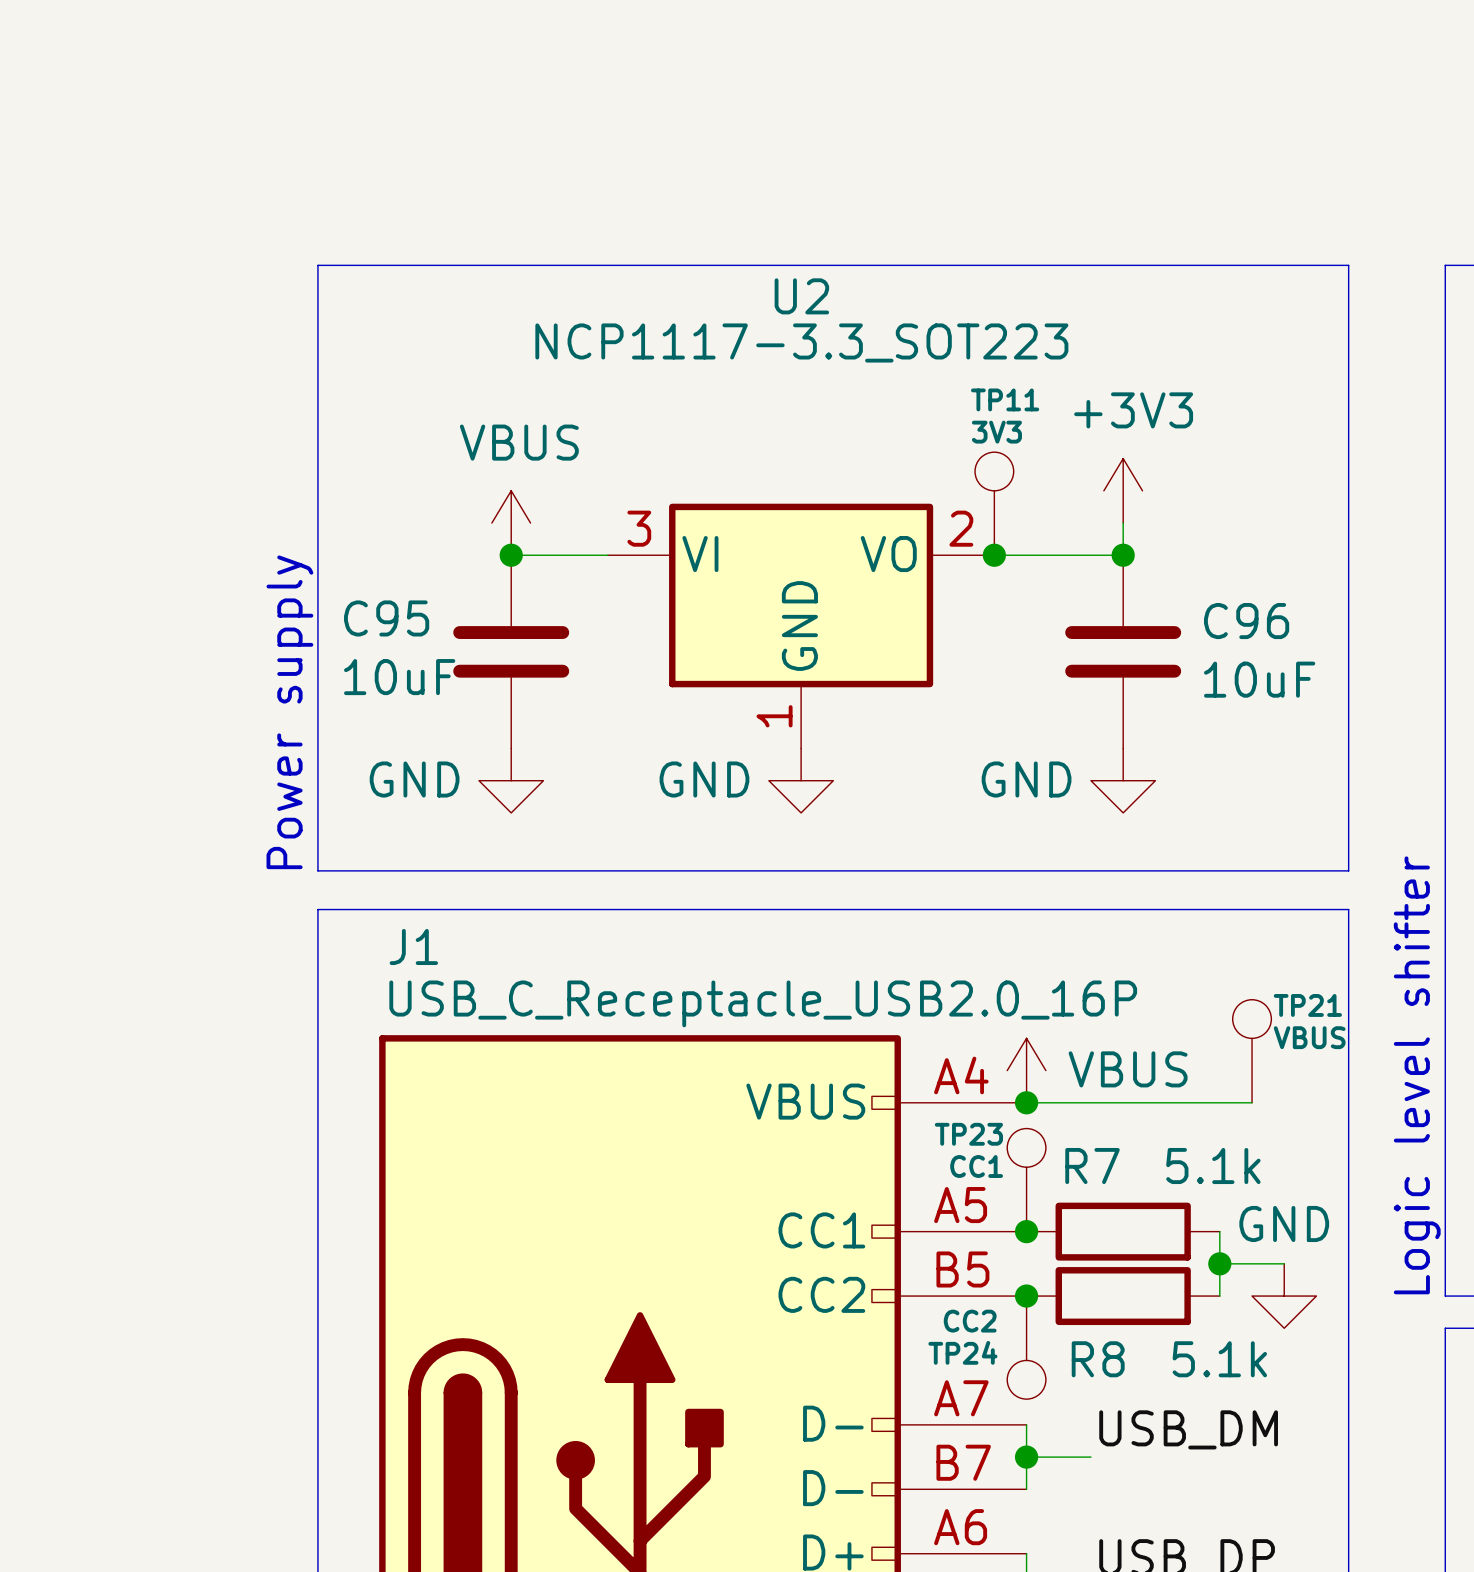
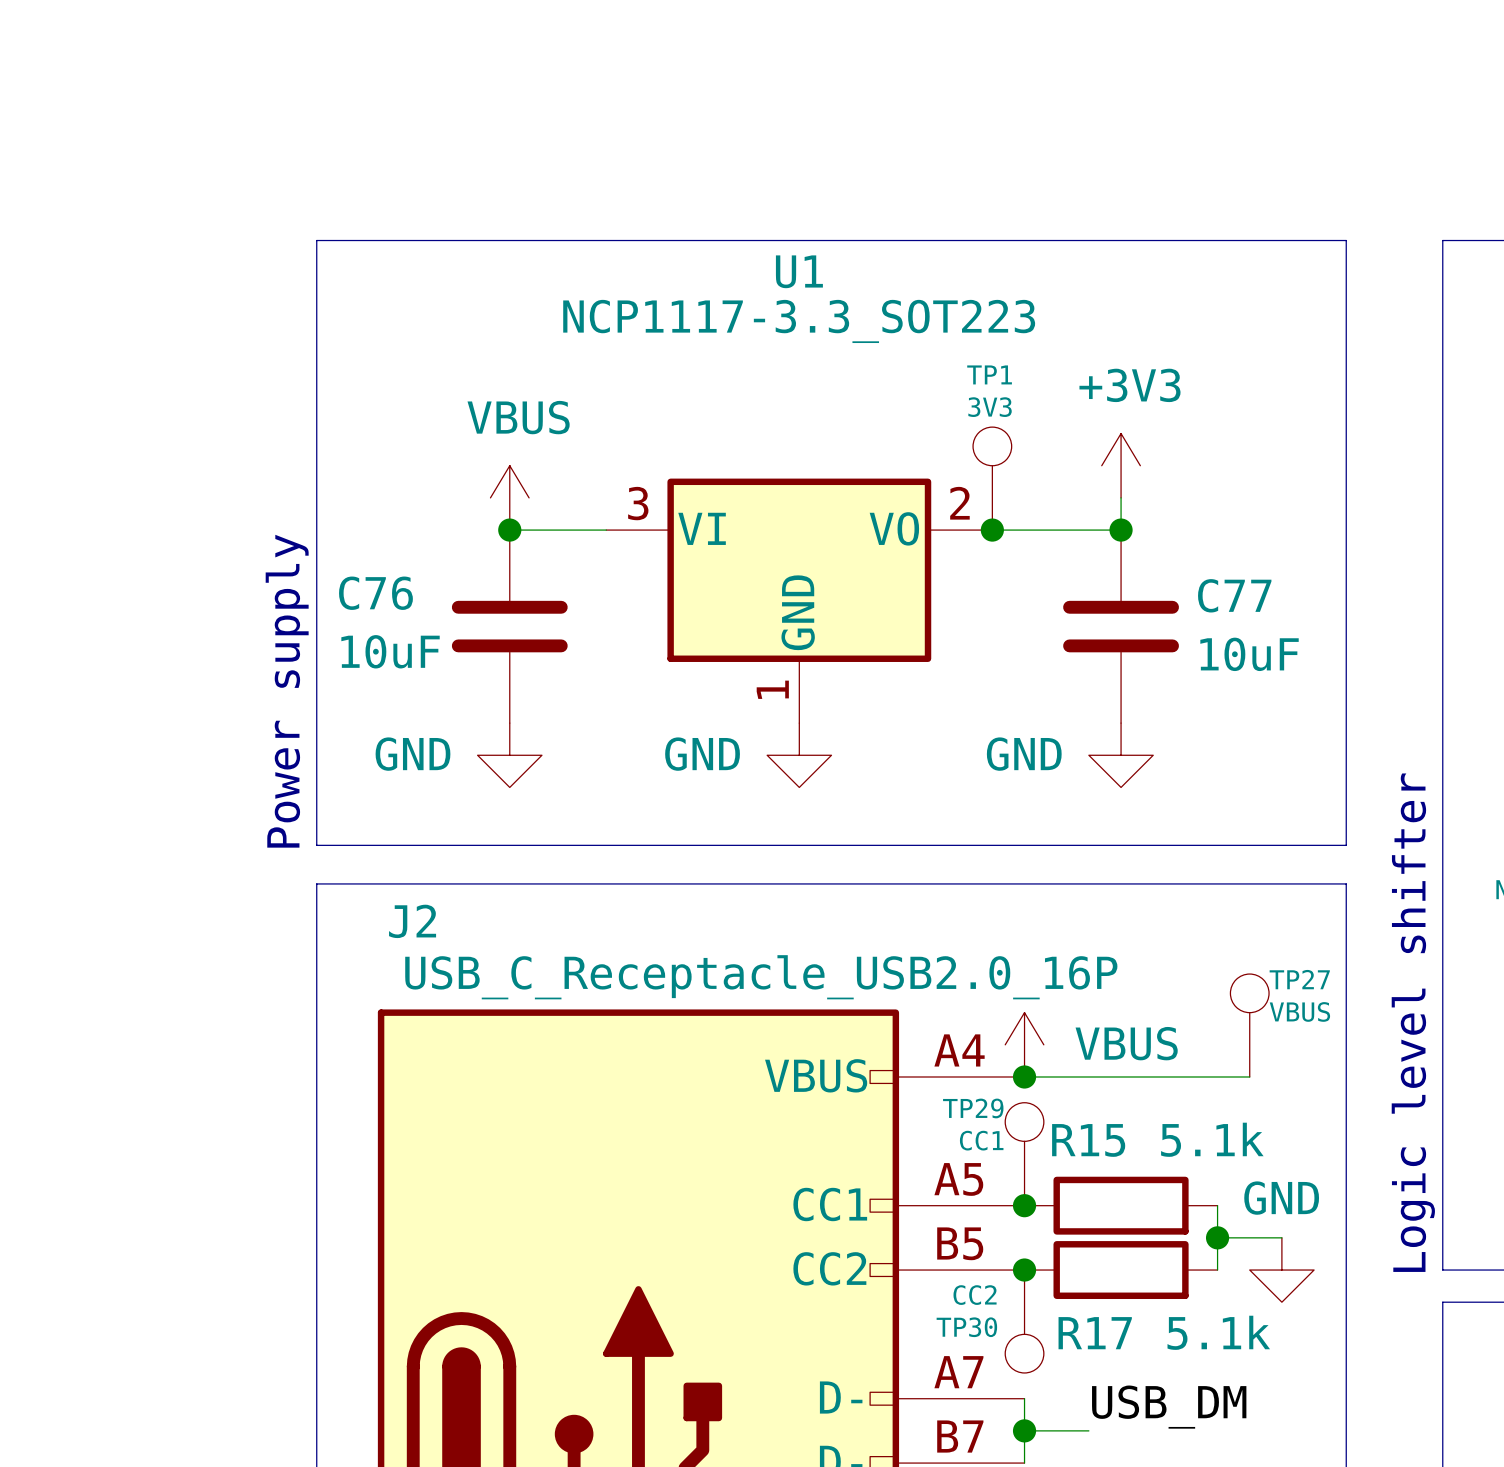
U2 name: U2 (801, 296) -> U1 (799, 271)
TP11 name: TP11 (1005, 399) -> TP1 (989, 374)
C95 name: C95 (386, 618) -> C76 (375, 593)
C96 name: C96 (1246, 621) -> C77 (1234, 595)
J1 name: J1 (413, 946) -> J2 (412, 921)
TP21 name: TP21 (1307, 1005) -> TP27 (1299, 979)
TP23 name: TP23 (968, 1134) -> TP29 (973, 1108)
R7 name: R7 (1092, 1166) -> R15 (1088, 1140)
TP24 name: TP24 (962, 1352) -> TP30 (966, 1327)
R8 name: R8 (1098, 1359) -> R17 (1095, 1333)

